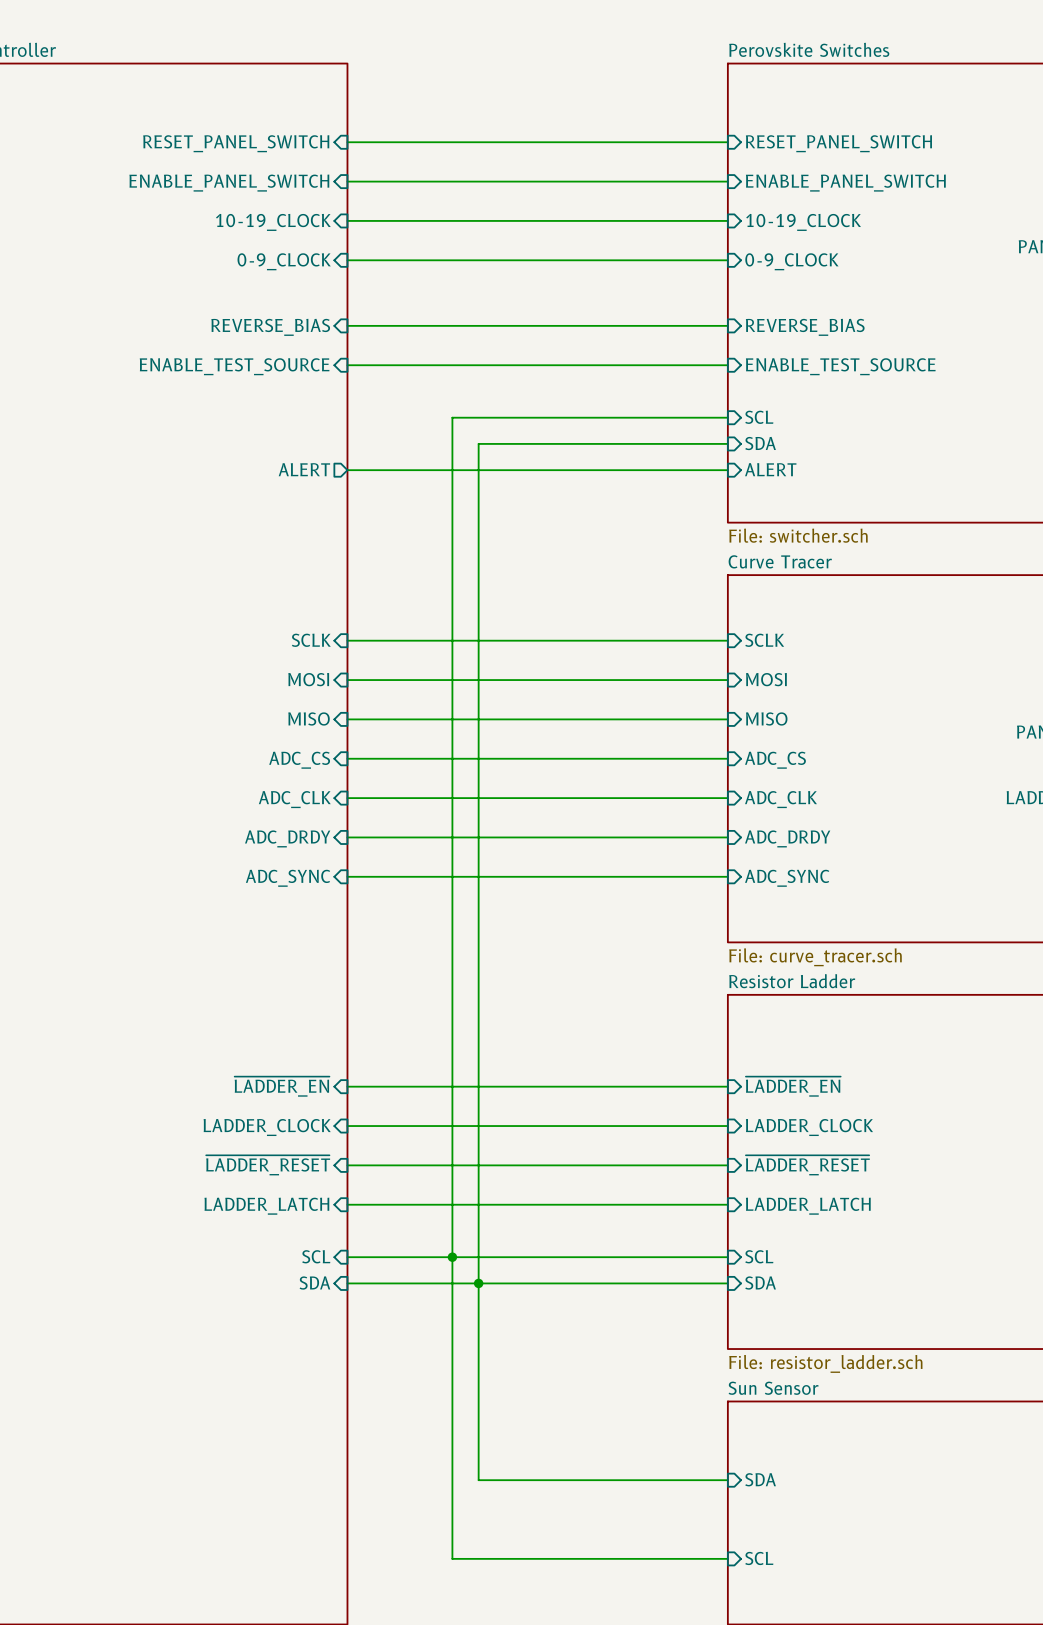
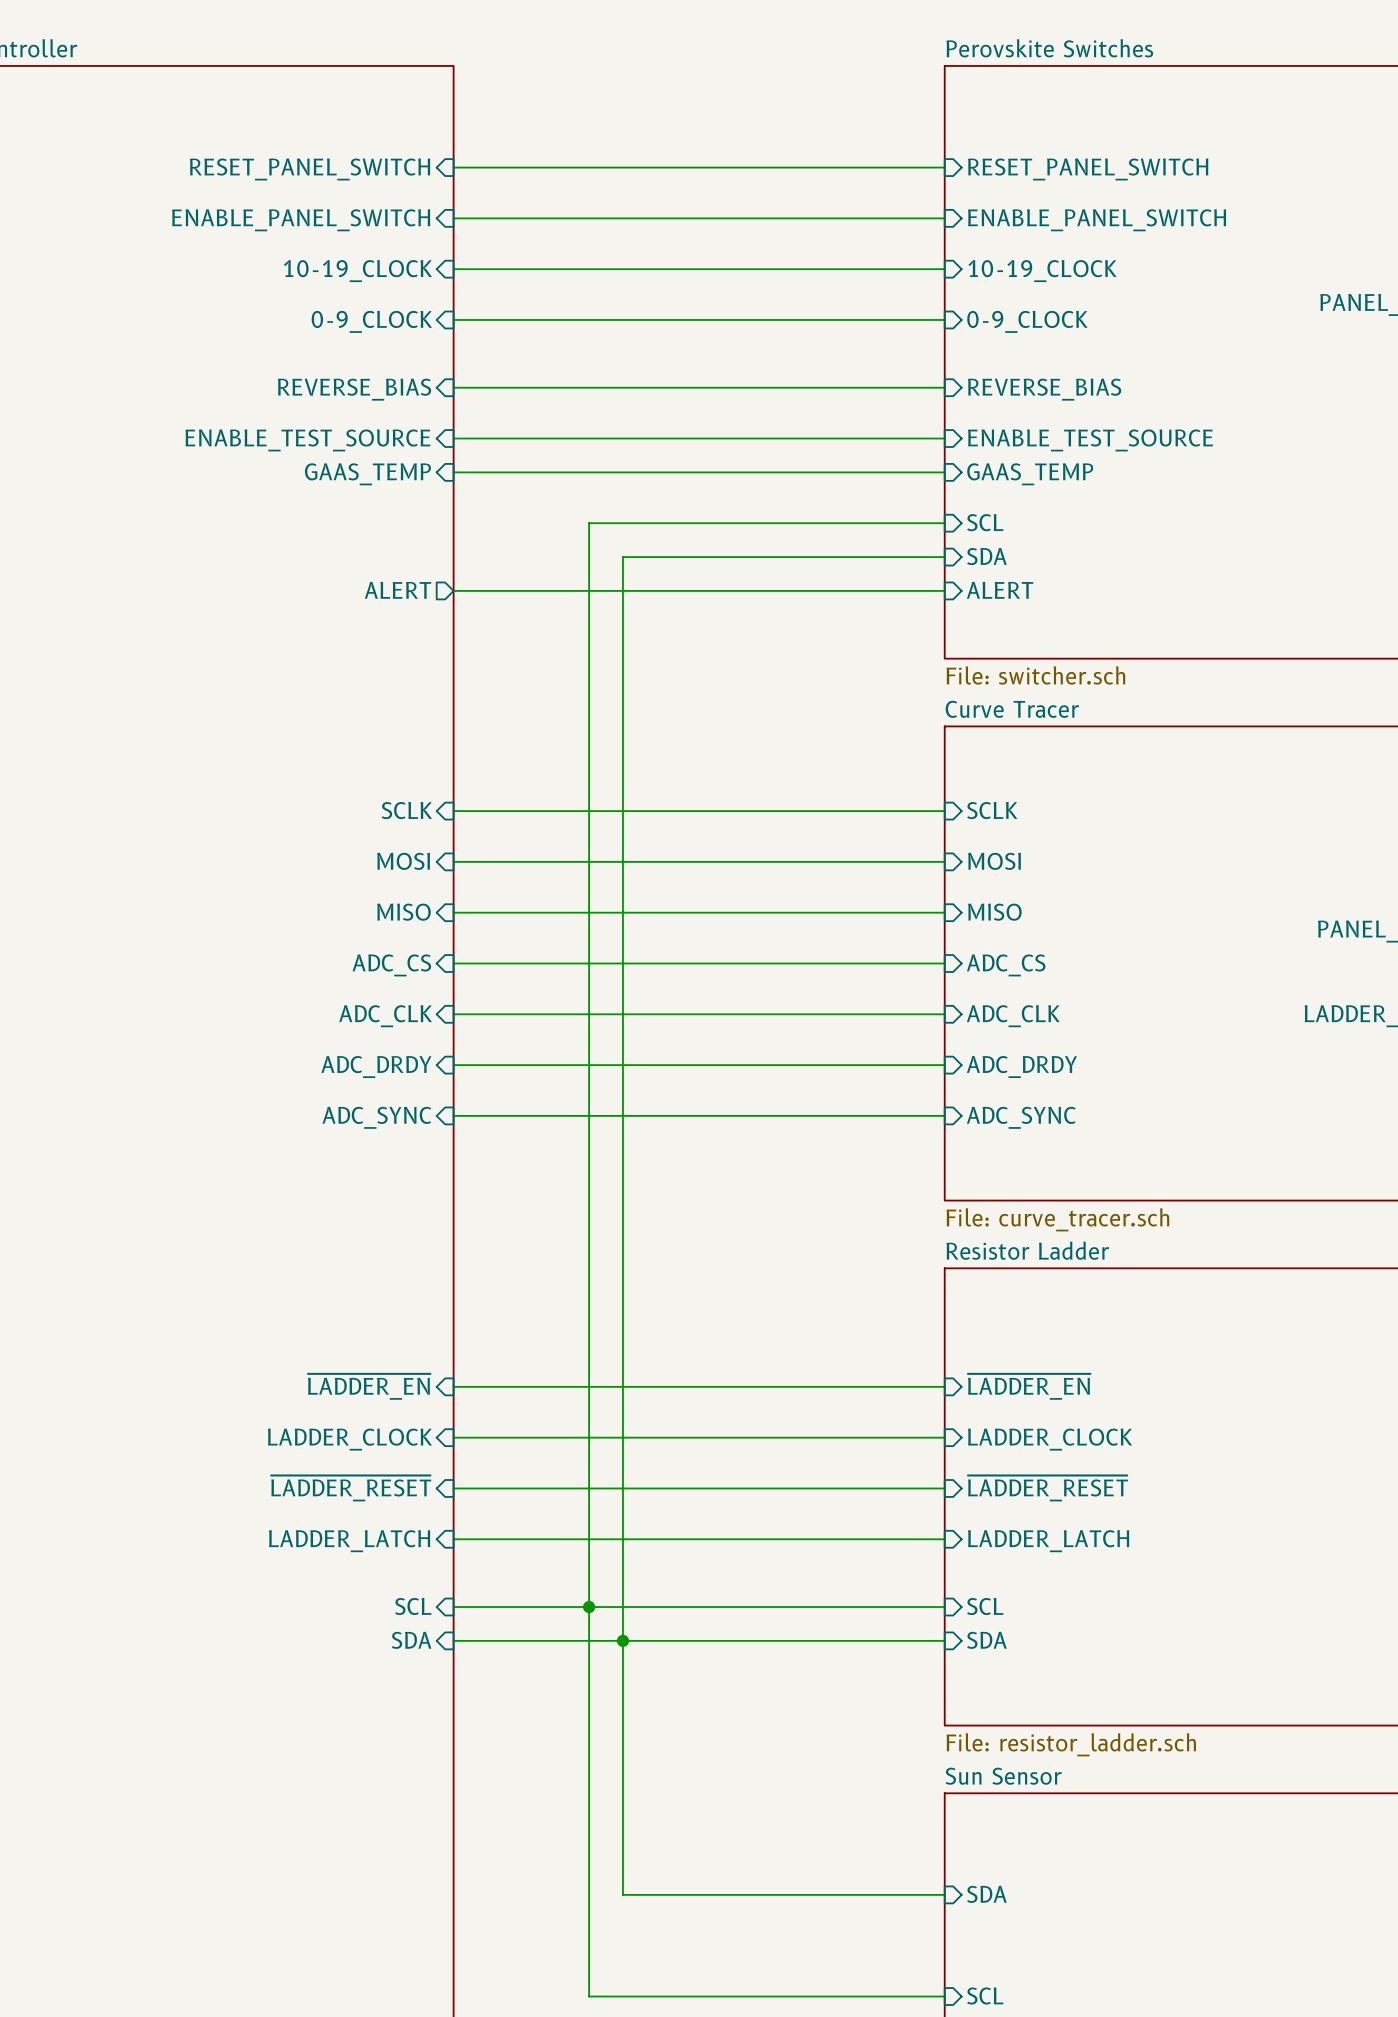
wire: (347, 325) (727, 325) -> (453, 387) (944, 387)
sheet pin position: REVERSE_BIAS (270, 327) -> REVERSE_BIAS (354, 389)
sheet pin position: REVERSE_BIAS (805, 327) -> REVERSE_BIAS (1044, 389)
wire: (347, 365) (727, 365) -> (453, 438) (944, 438)
sheet pin position: ENABLE_TEST_SOURCE (234, 366) -> ENABLE_TEST_SOURCE (307, 440)
sheet pin position: ENABLE_TEST_SOURCE (840, 366) -> ENABLE_TEST_SOURCE (1090, 440)
wire: none -> (453, 472) (944, 472)
sheet pin: none -> GAAS_TEMP (367, 474)
sheet pin: none -> GAAS_TEMP (1030, 474)

